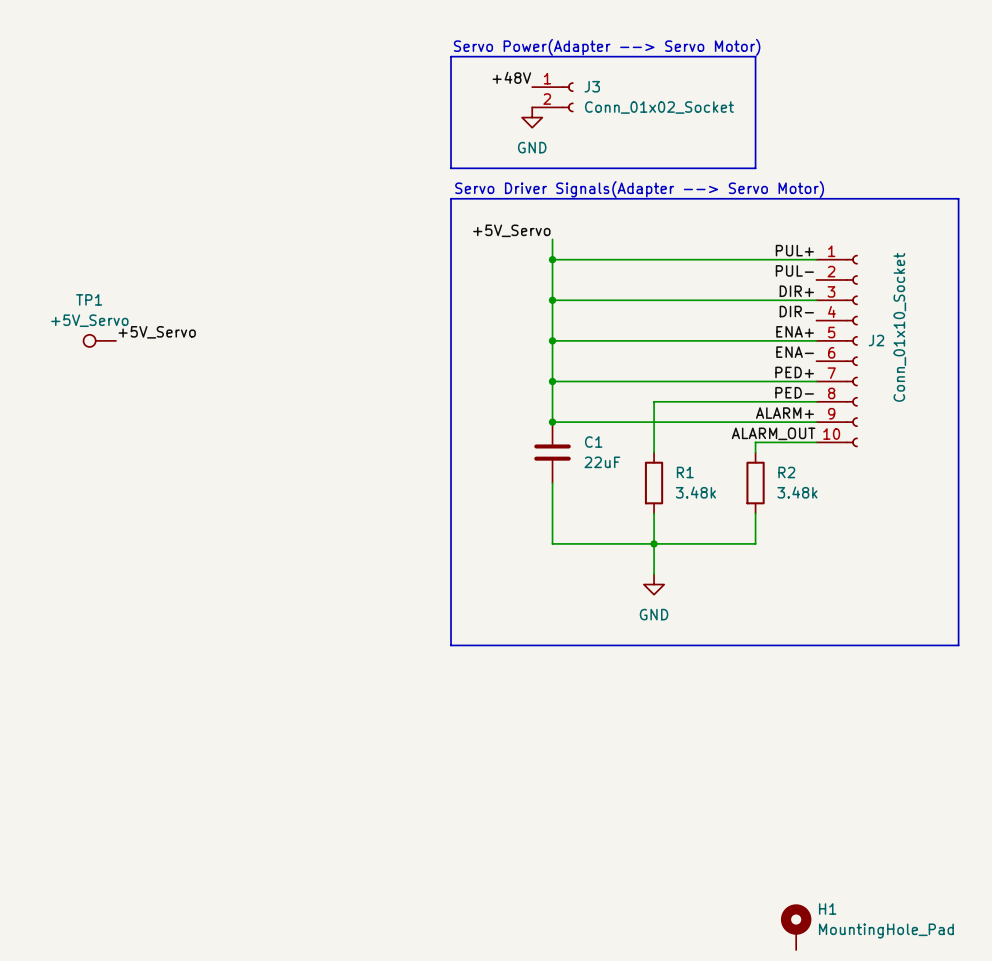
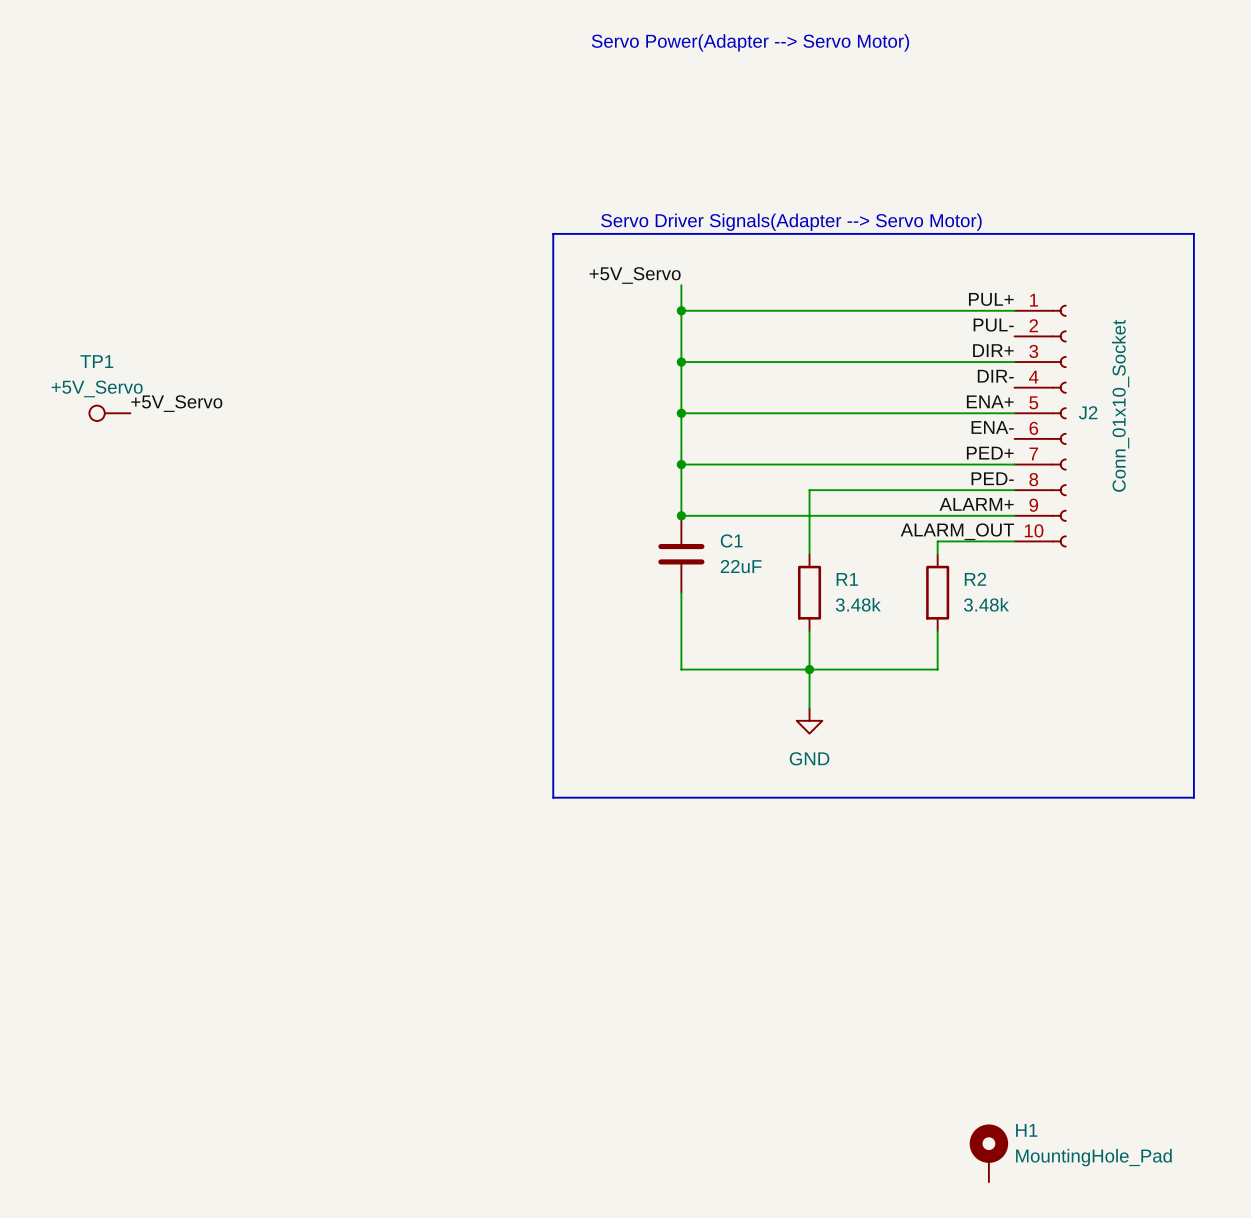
line: (451, 56) (755, 56) (755, 168) (451, 168) (451, 56) -> none
label: +48V (511, 77) -> none
J3: Conn_01x02_Socket (552, 97) -> none
power symbol: GND (532, 117) -> none

